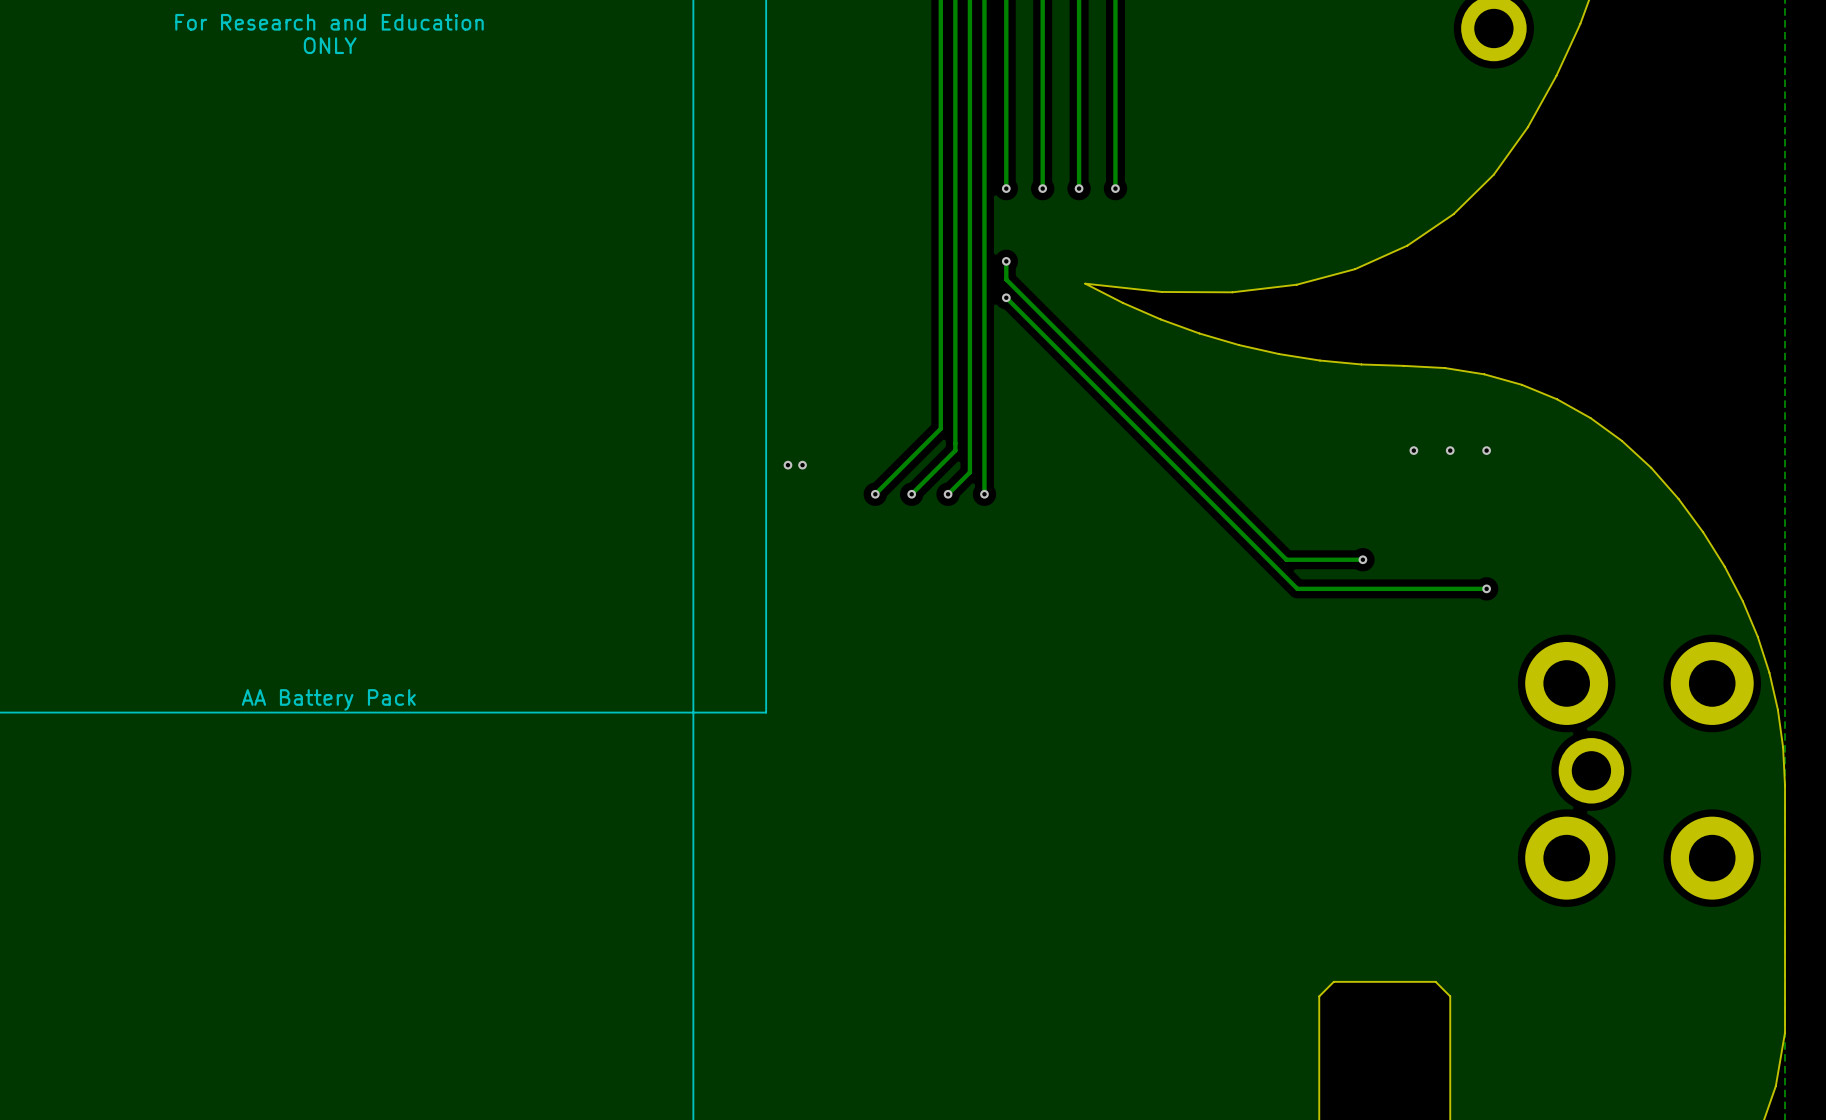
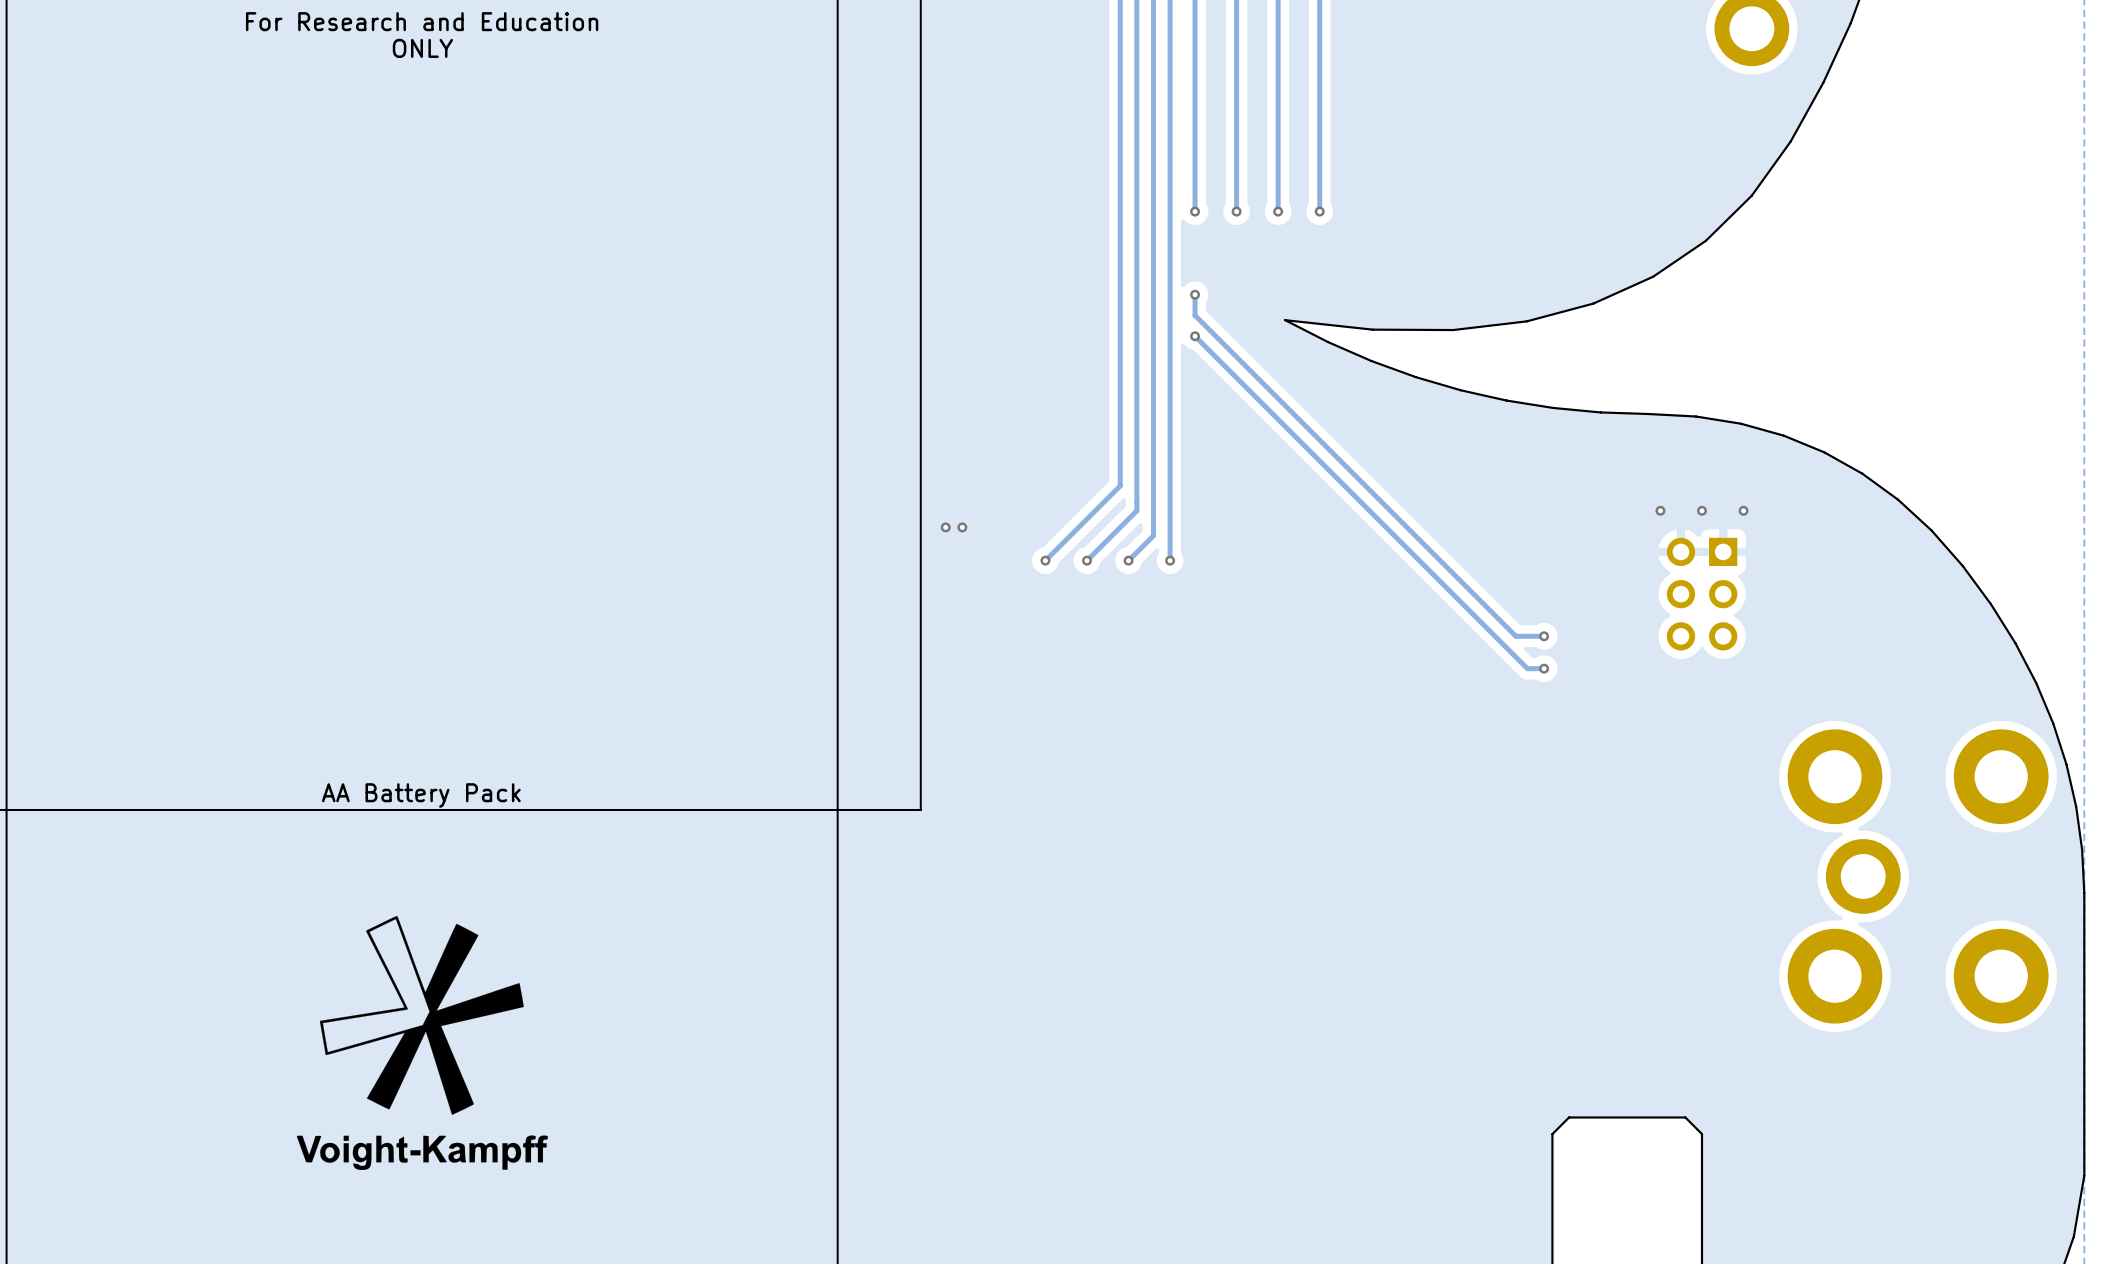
part: none -> (1702, 594)
track: (1362, 559) (1286, 559) -> (1544, 636) (1515, 635)
via: (1362, 559) -> none
via: none -> (1544, 636)
via: none -> (1544, 668)
track: (1486, 588) (1311, 588) -> none
via: (1486, 588) -> none
drawing: none -> [296, 915, 548, 1171]

